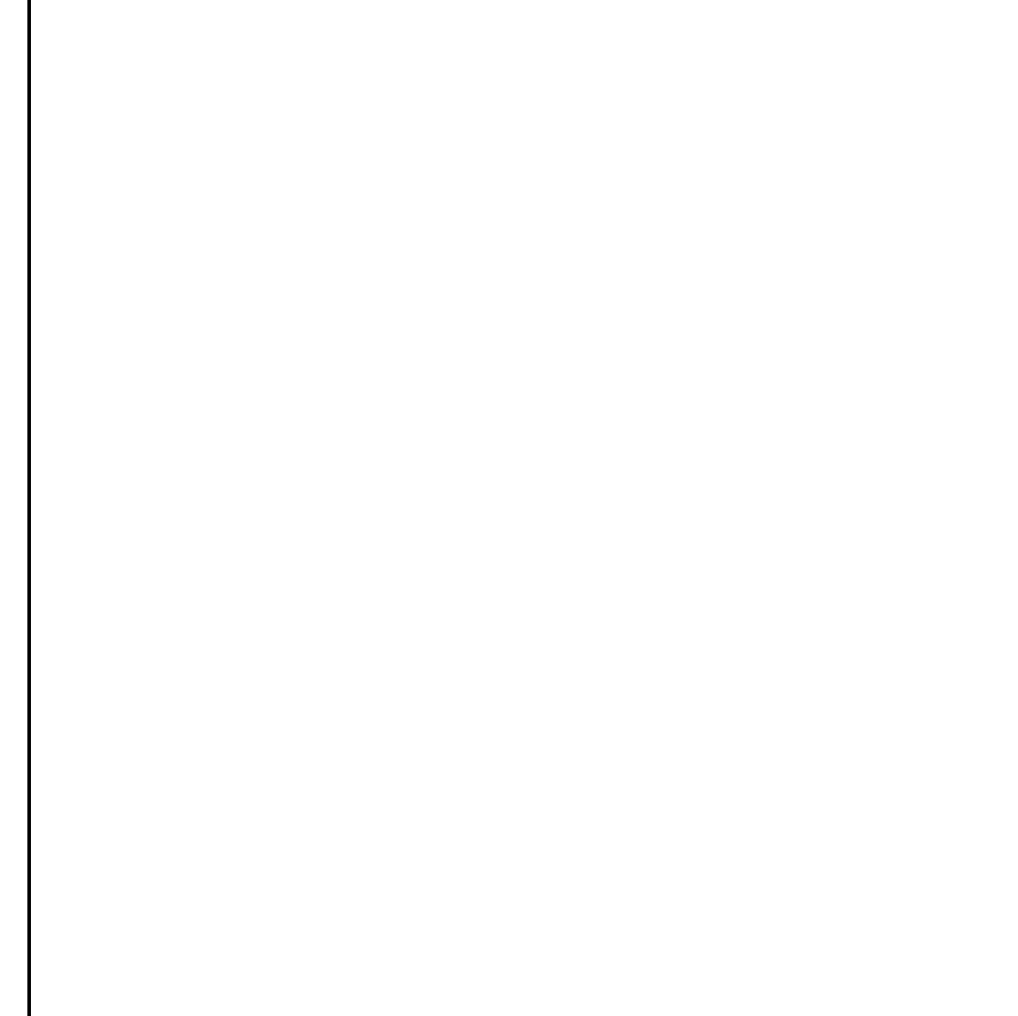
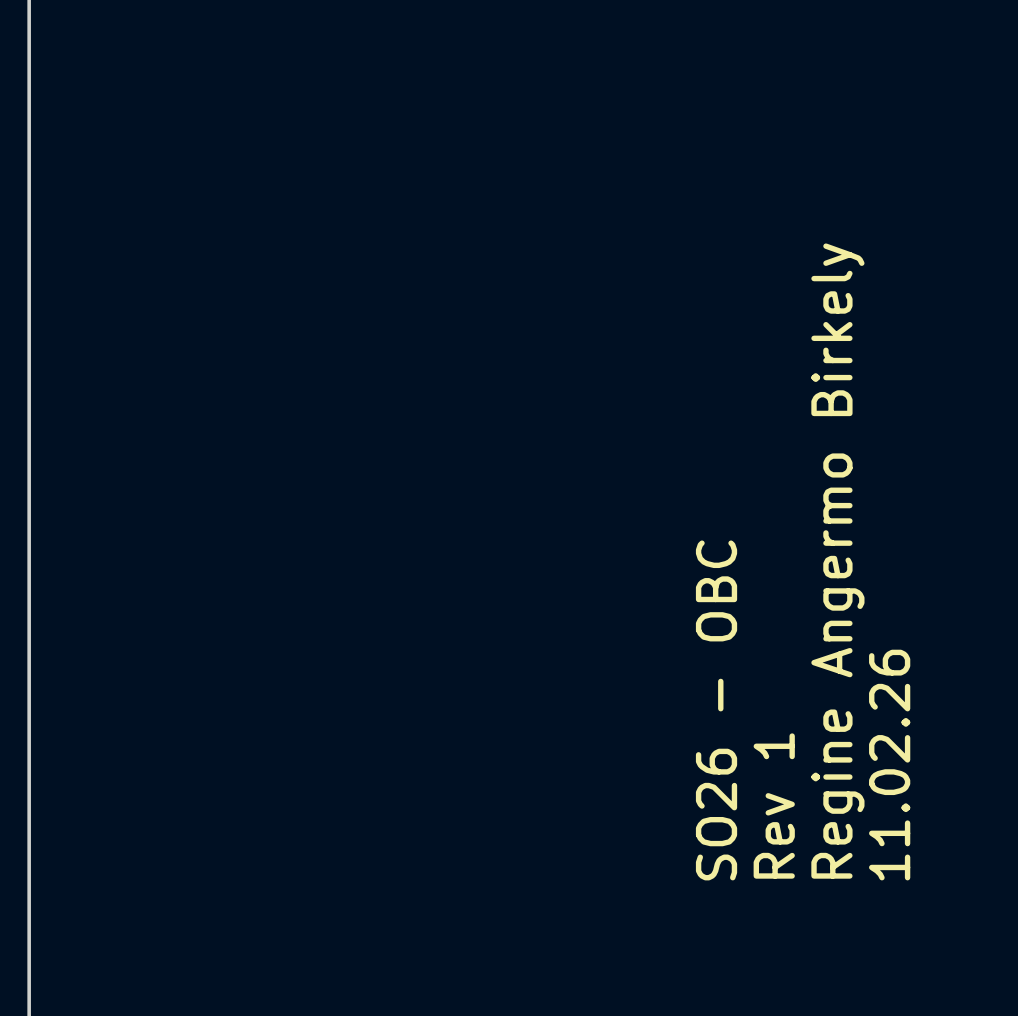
text: none -> Regine Angermo Birkely (837, 561)
text: none -> SO26 - OBC (716, 710)
text: none -> 11.02.26 (889, 765)
text: none -> Rev 1 (774, 806)

